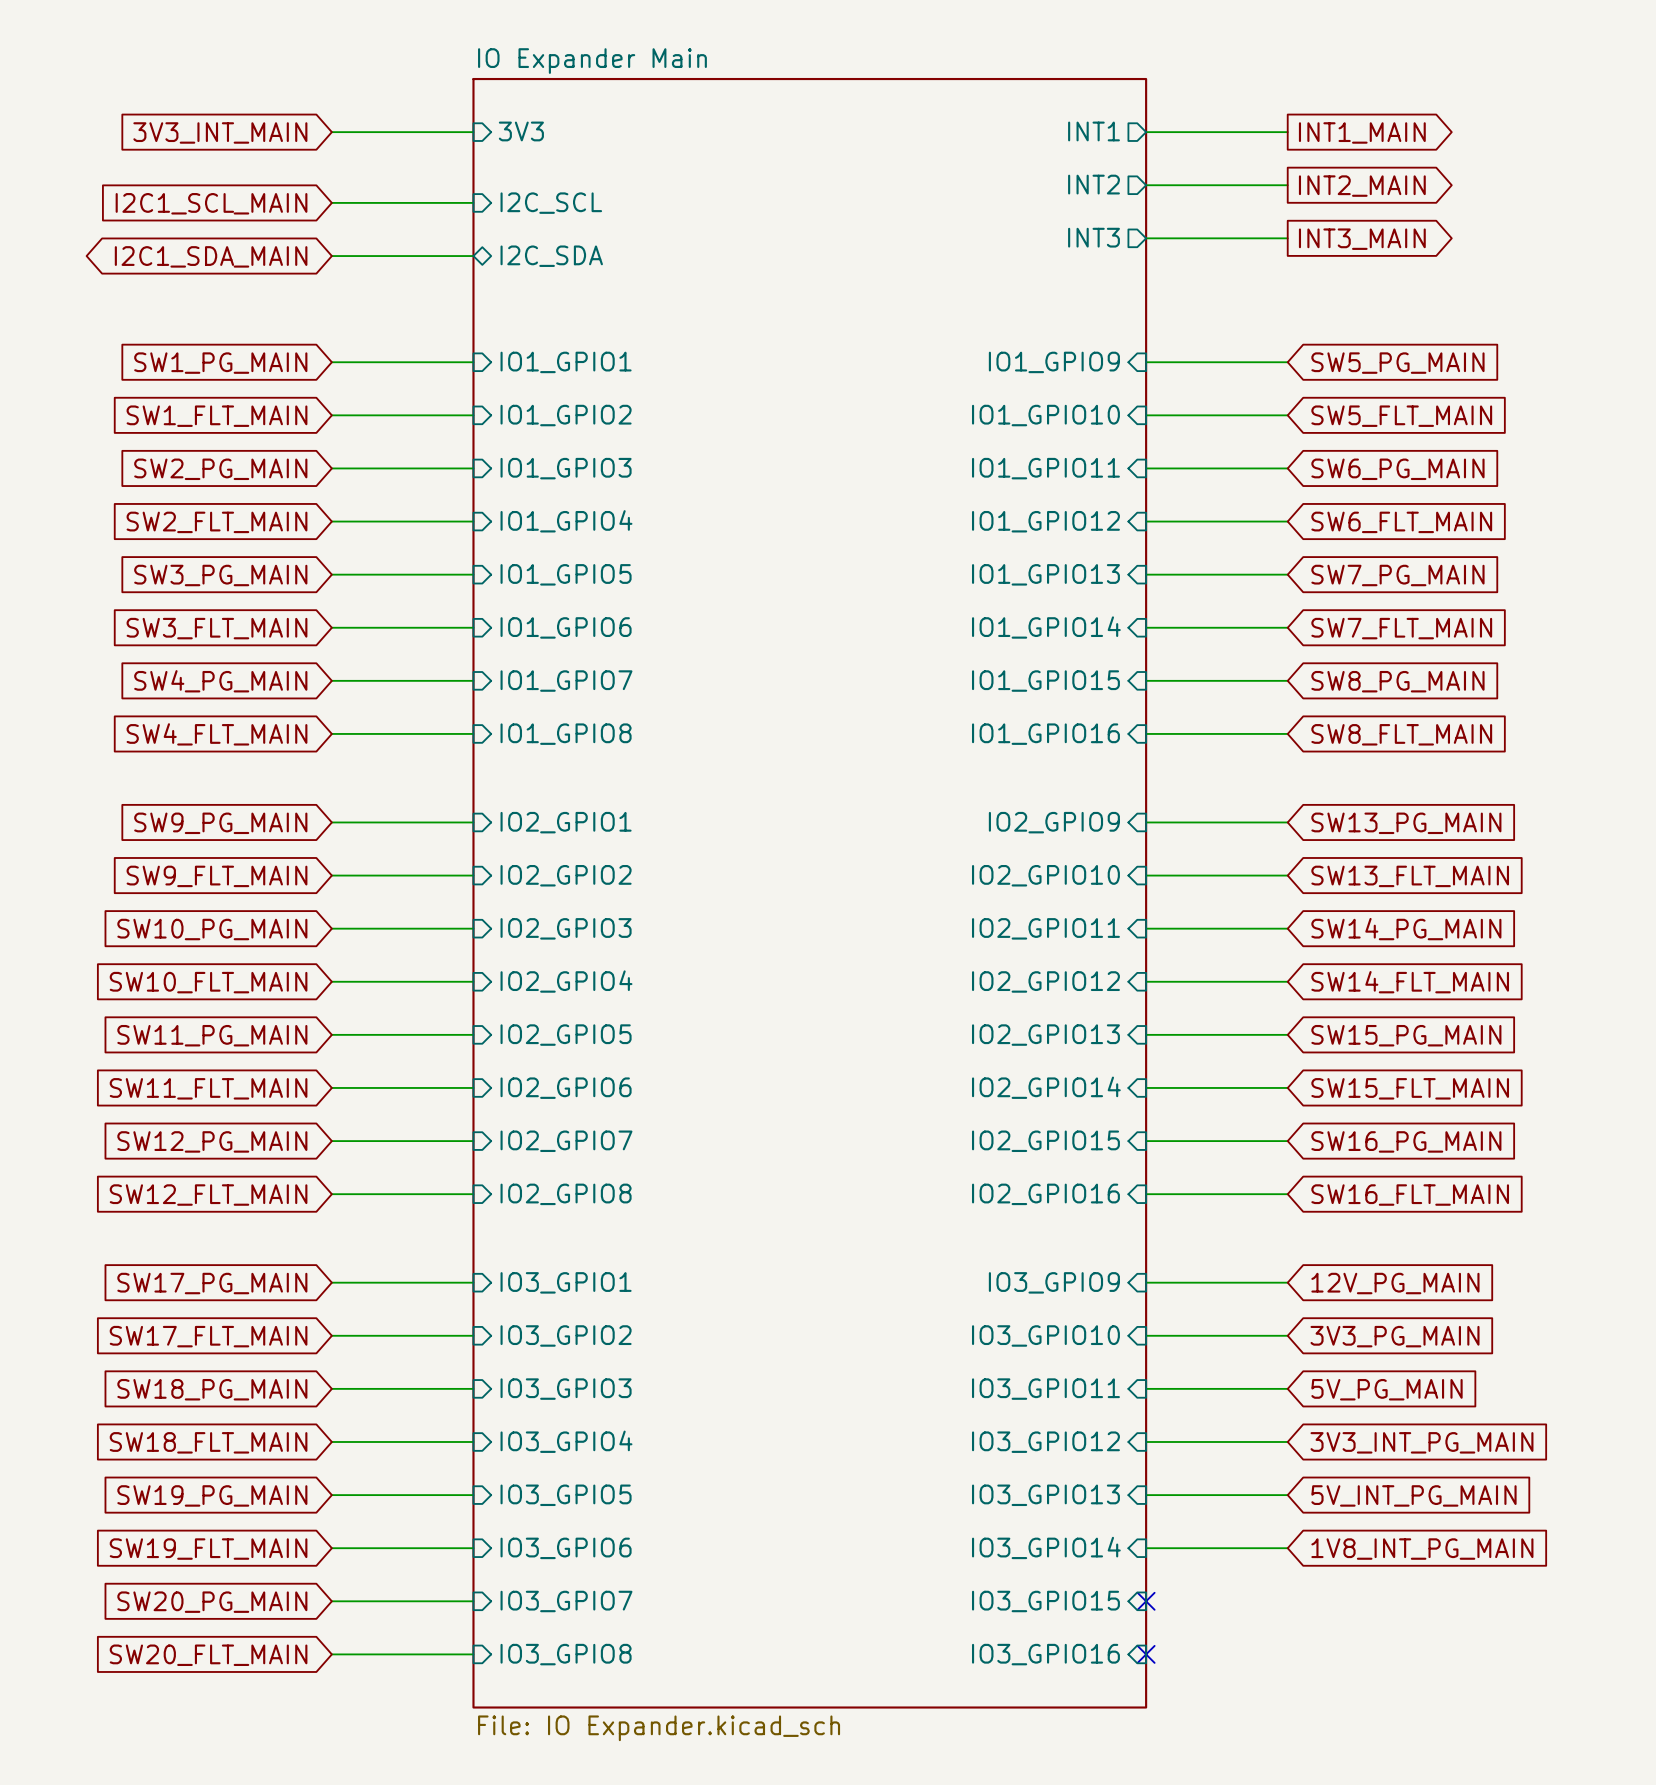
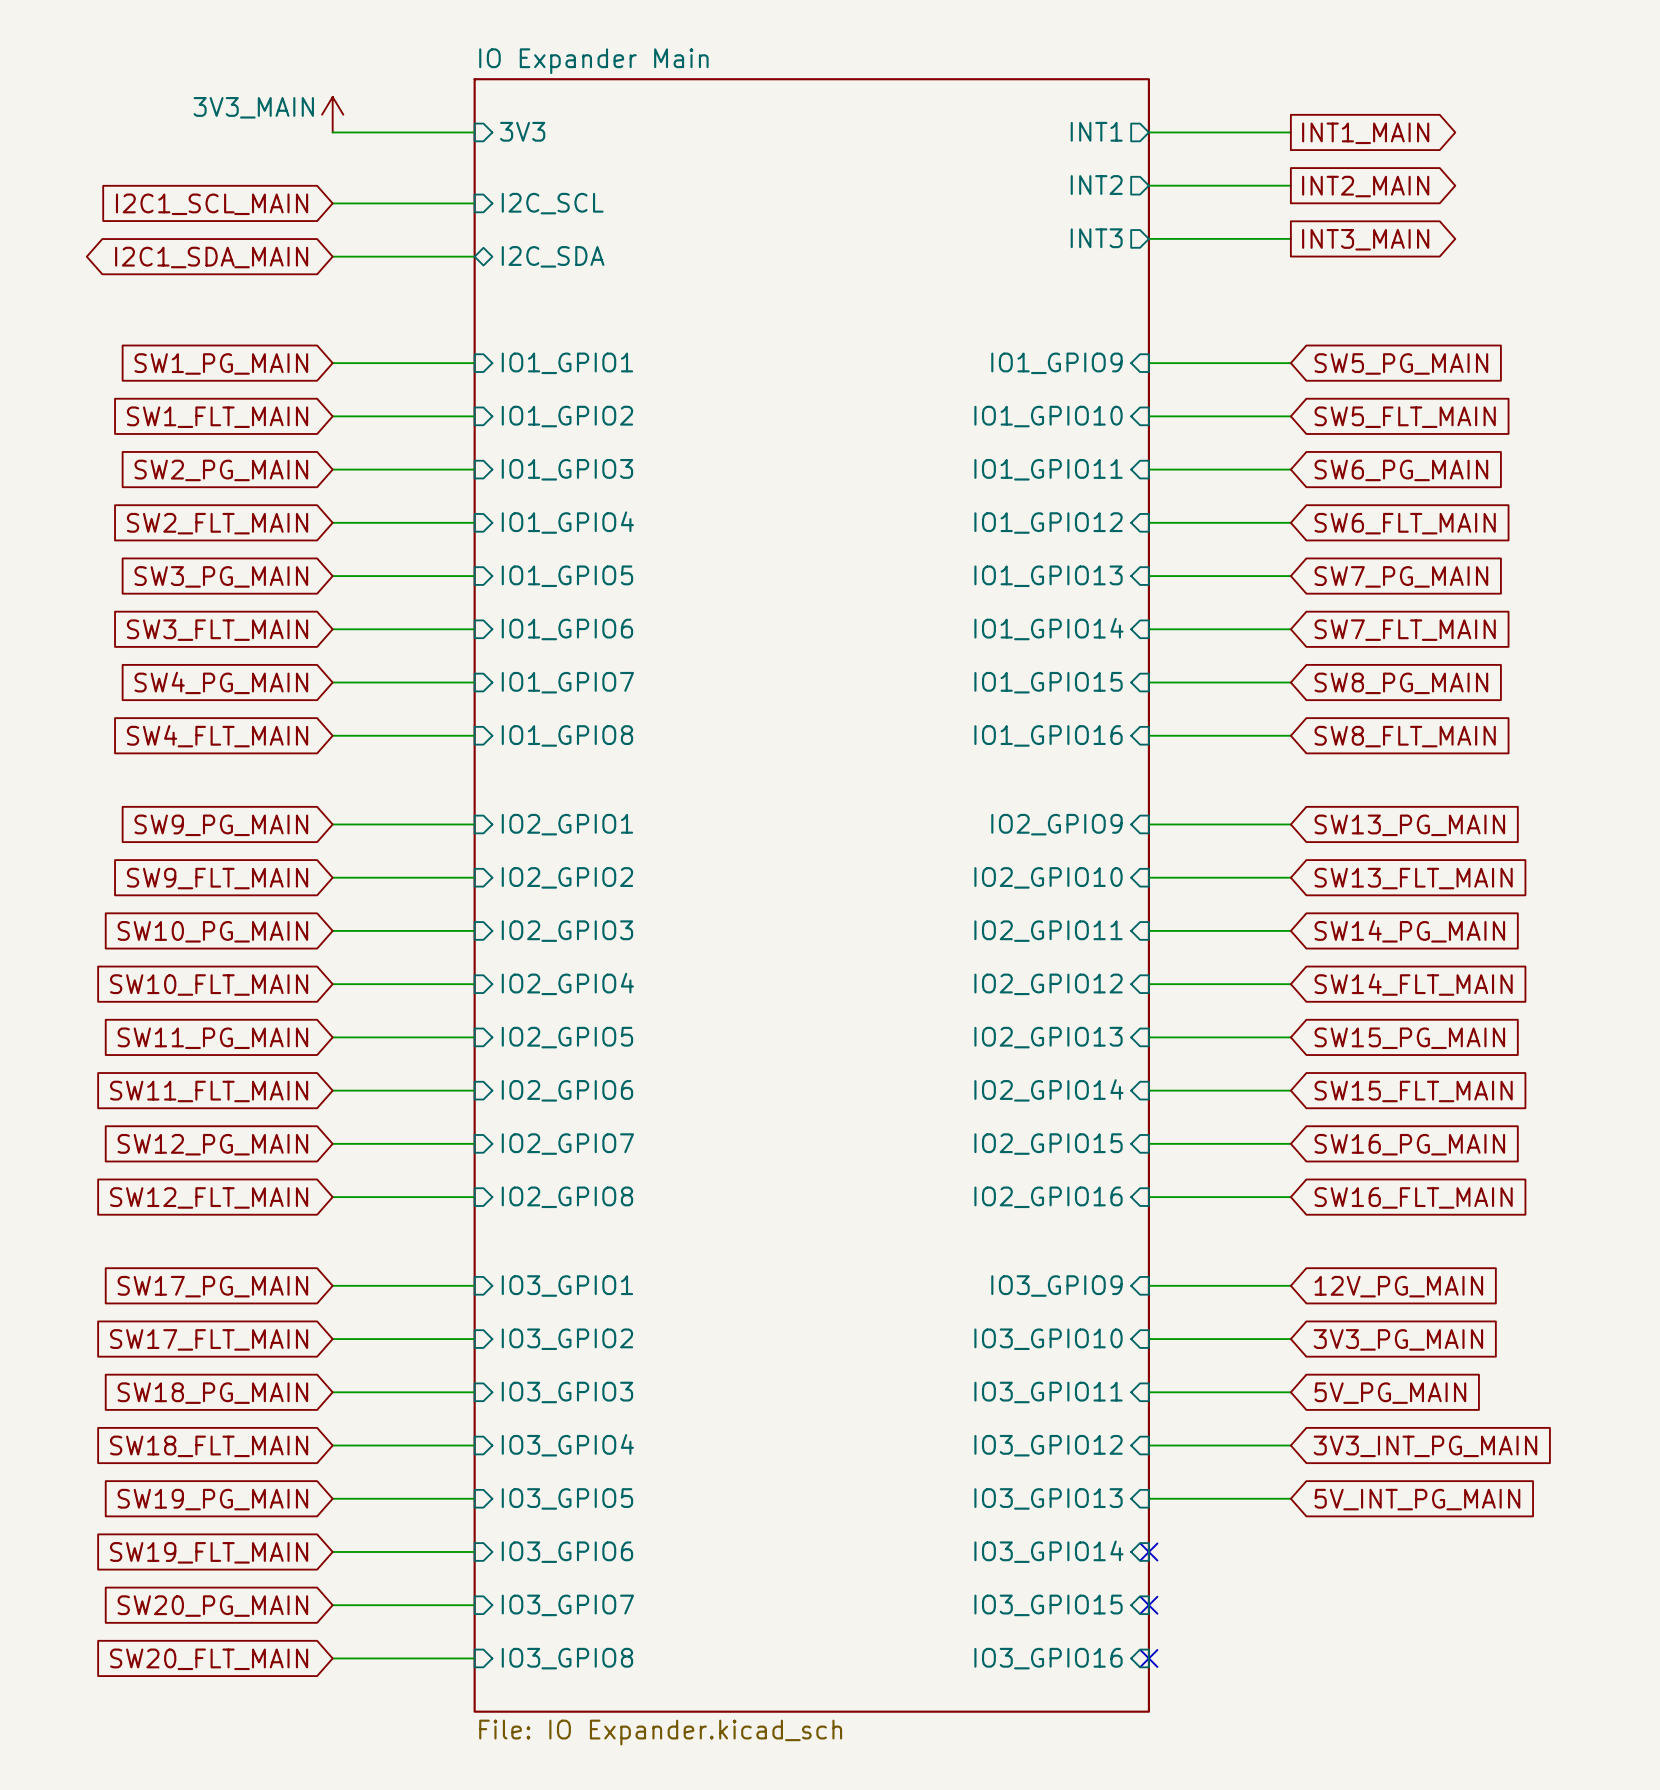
power symbol: none -> 3V3_MAIN (332, 114)
global label: 3V3_INT_MAIN (220, 132) -> none
wire: (1146, 1548) (1287, 1548) -> none
no-connect mark: none -> (1148, 1551)
global label: 1V8_INT_PG_MAIN (1422, 1549) -> none

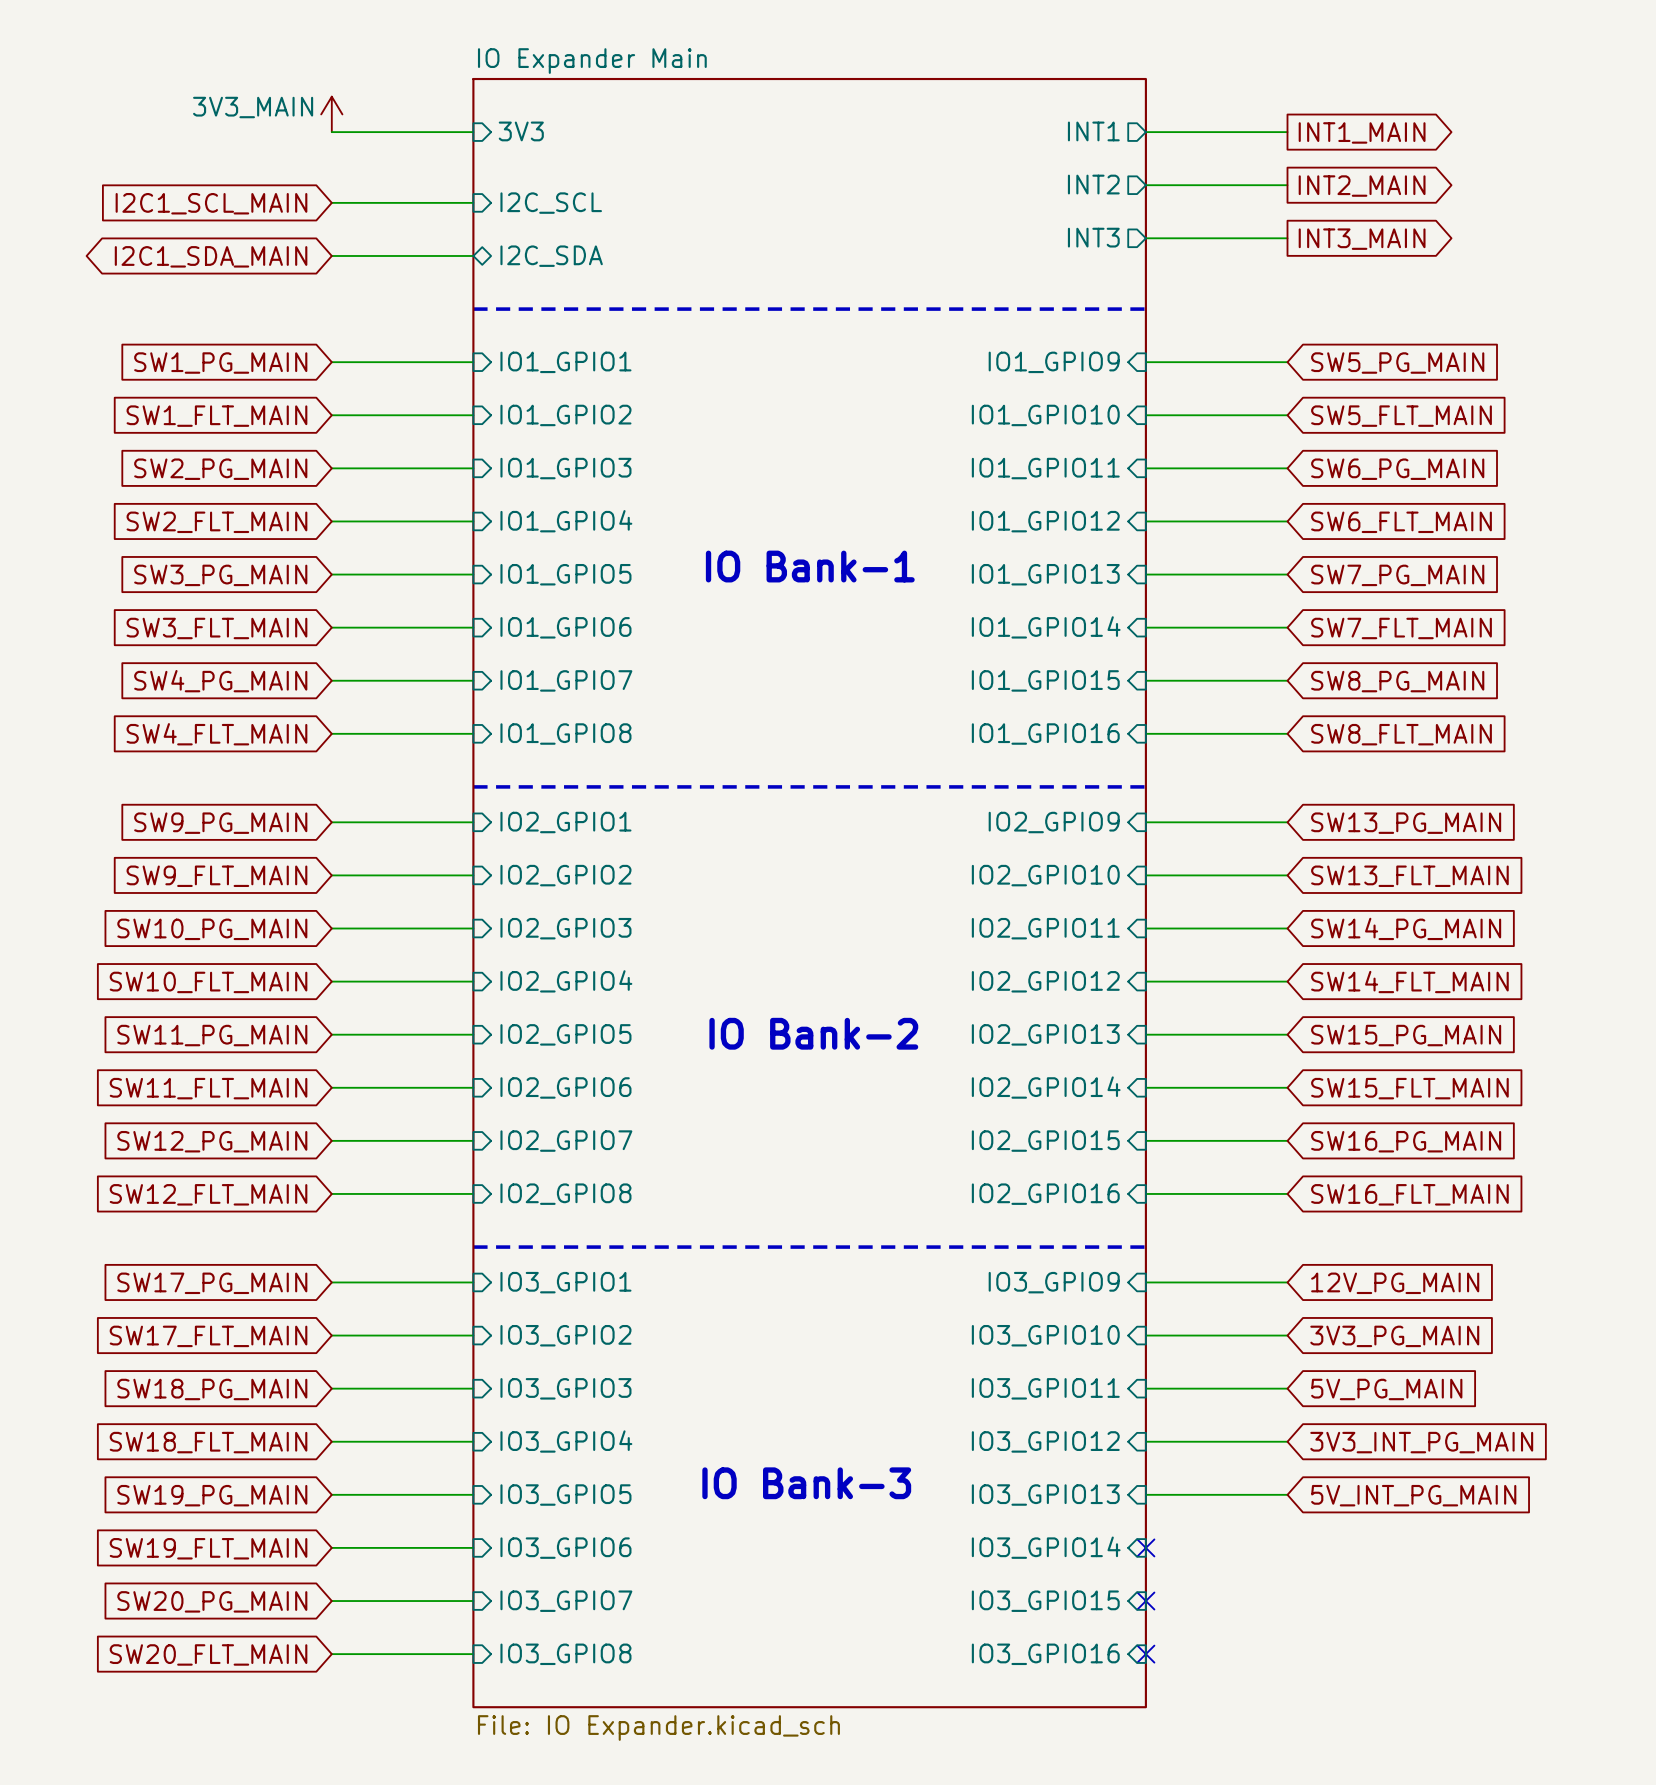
line: none -> (473, 309) (1145, 309)
text: none -> IO Bank-1 (810, 566)
line: none -> (473, 786) (1145, 786)
text: none -> IO Bank-2 (813, 1033)
line: none -> (473, 1247) (1145, 1247)
text: none -> IO Bank-3 (806, 1483)

